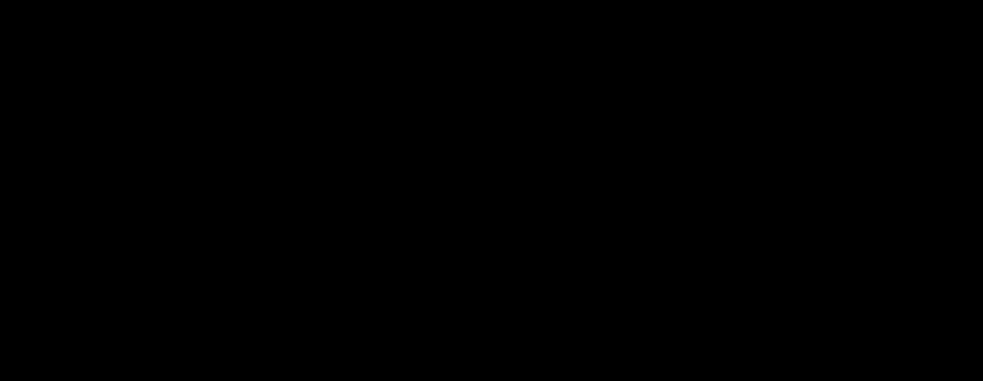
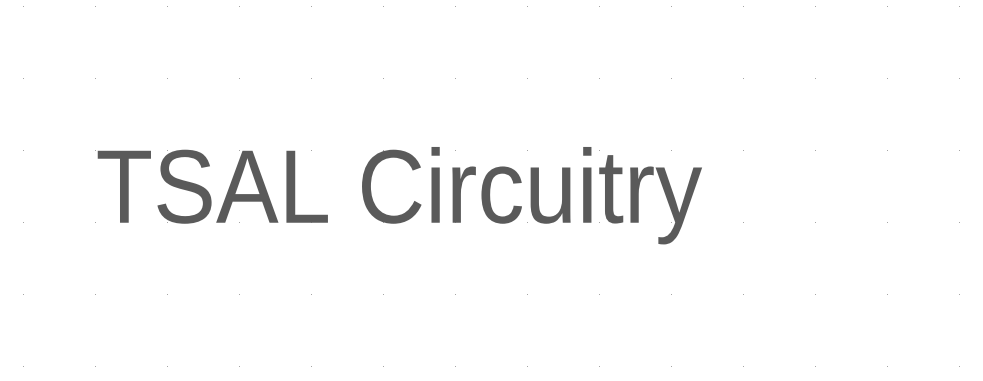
text: none -> TSAL Circuitry (399, 195)

